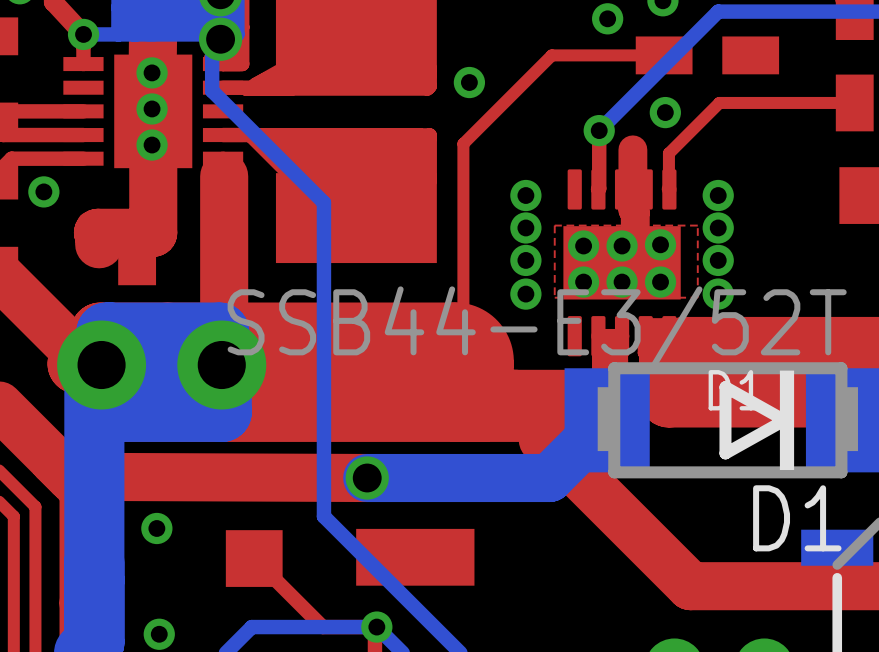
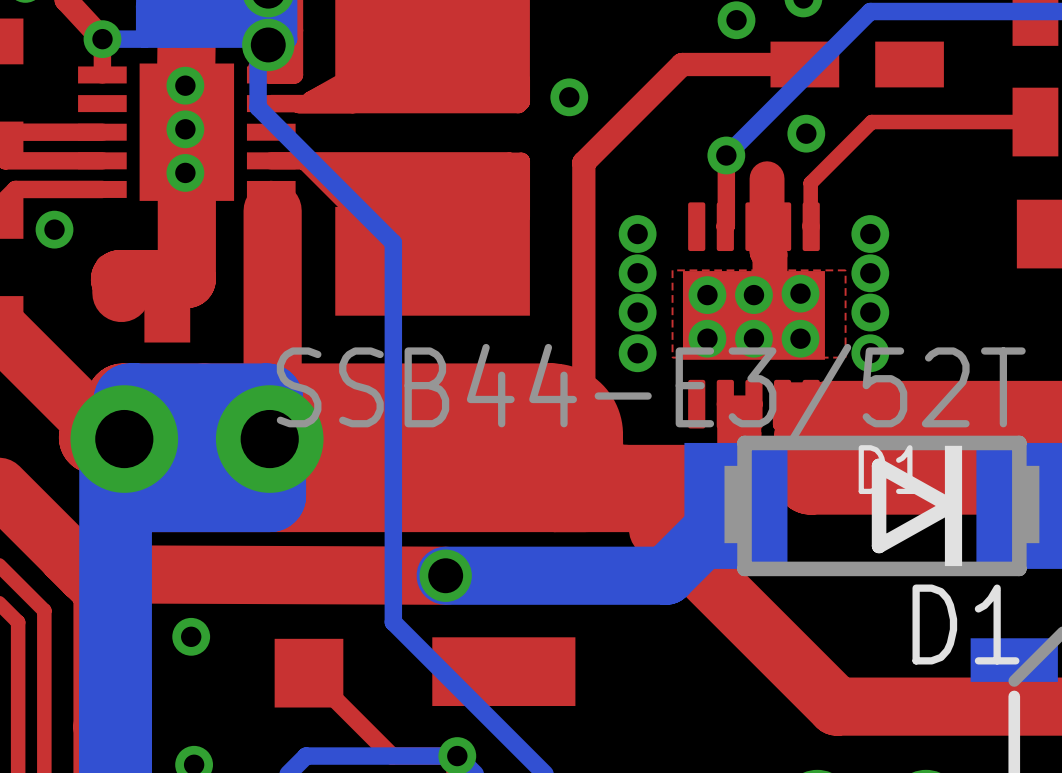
top track: (562, 55) (551, 55) (463, 143) (463, 324) -> (682, 64) (583, 162) (583, 431) (586, 434)
top track width: thin (664, 55) (562, 55) -> thick (804, 64) (682, 64)

